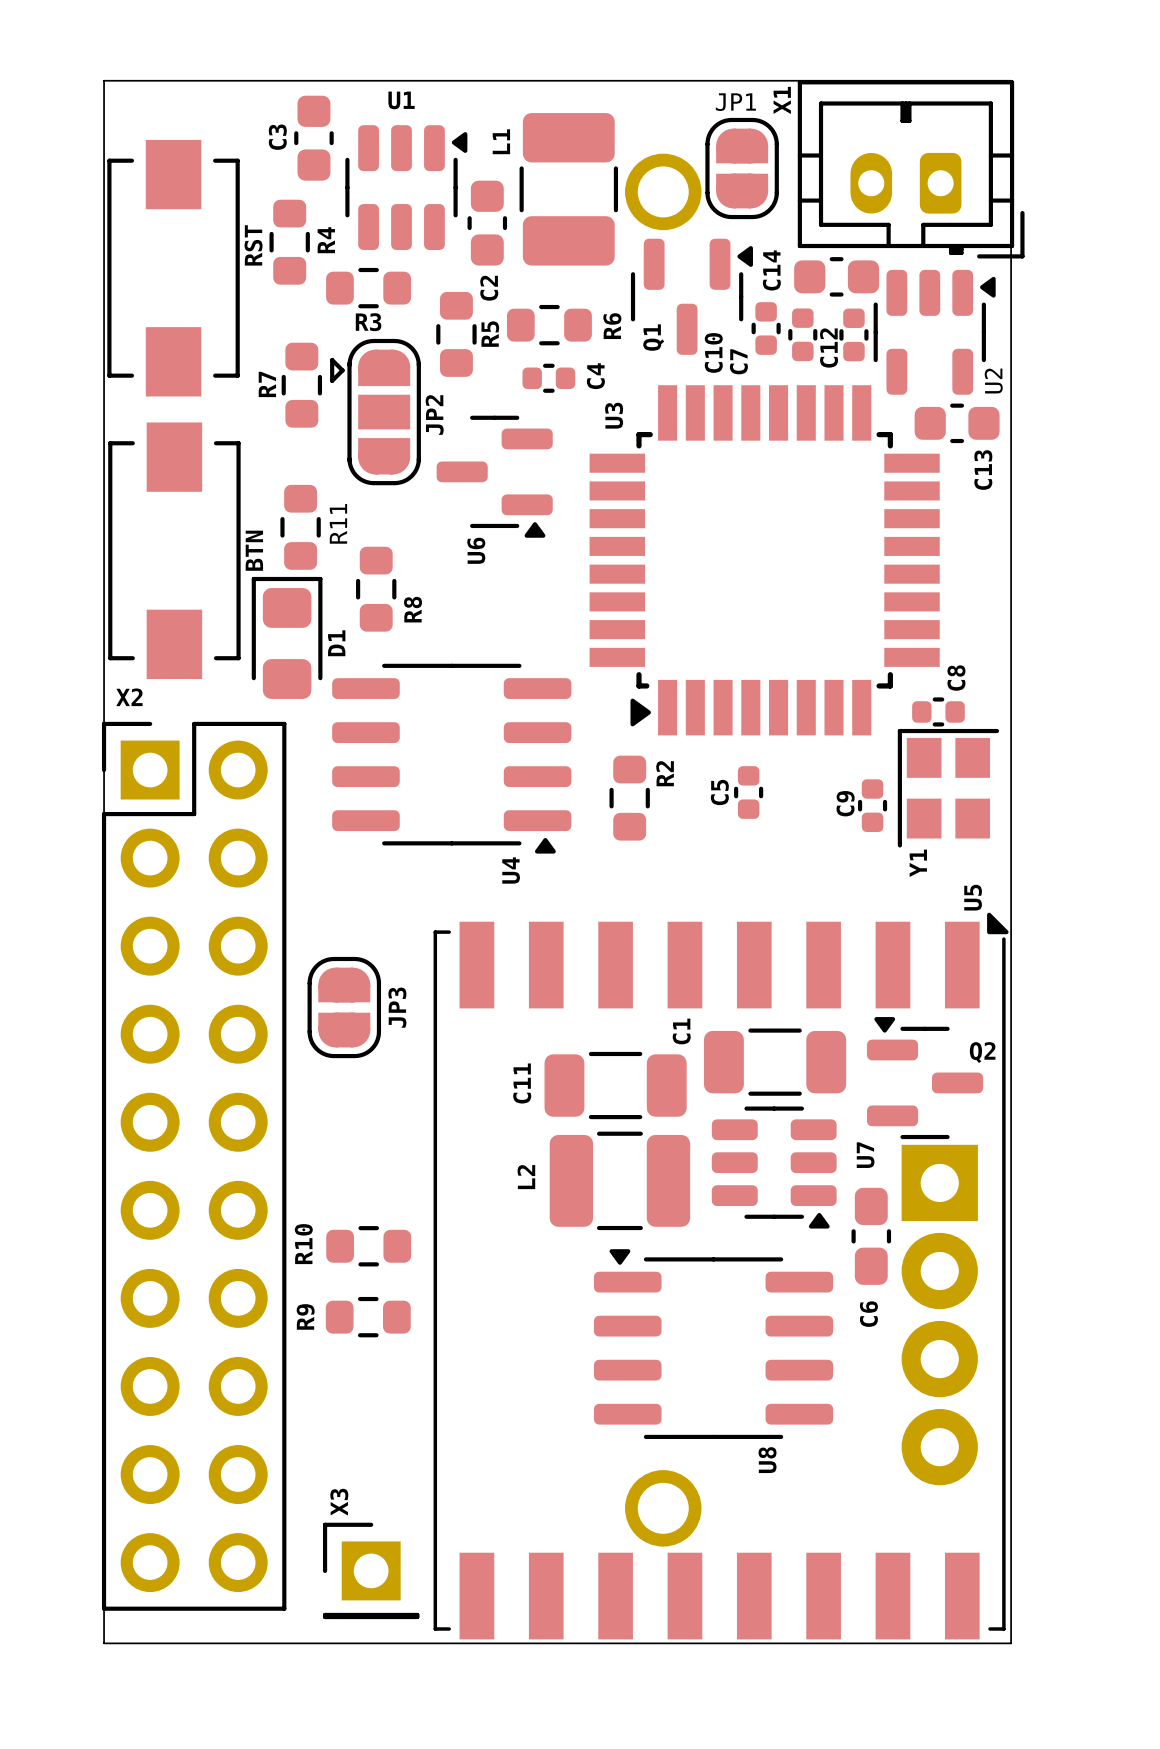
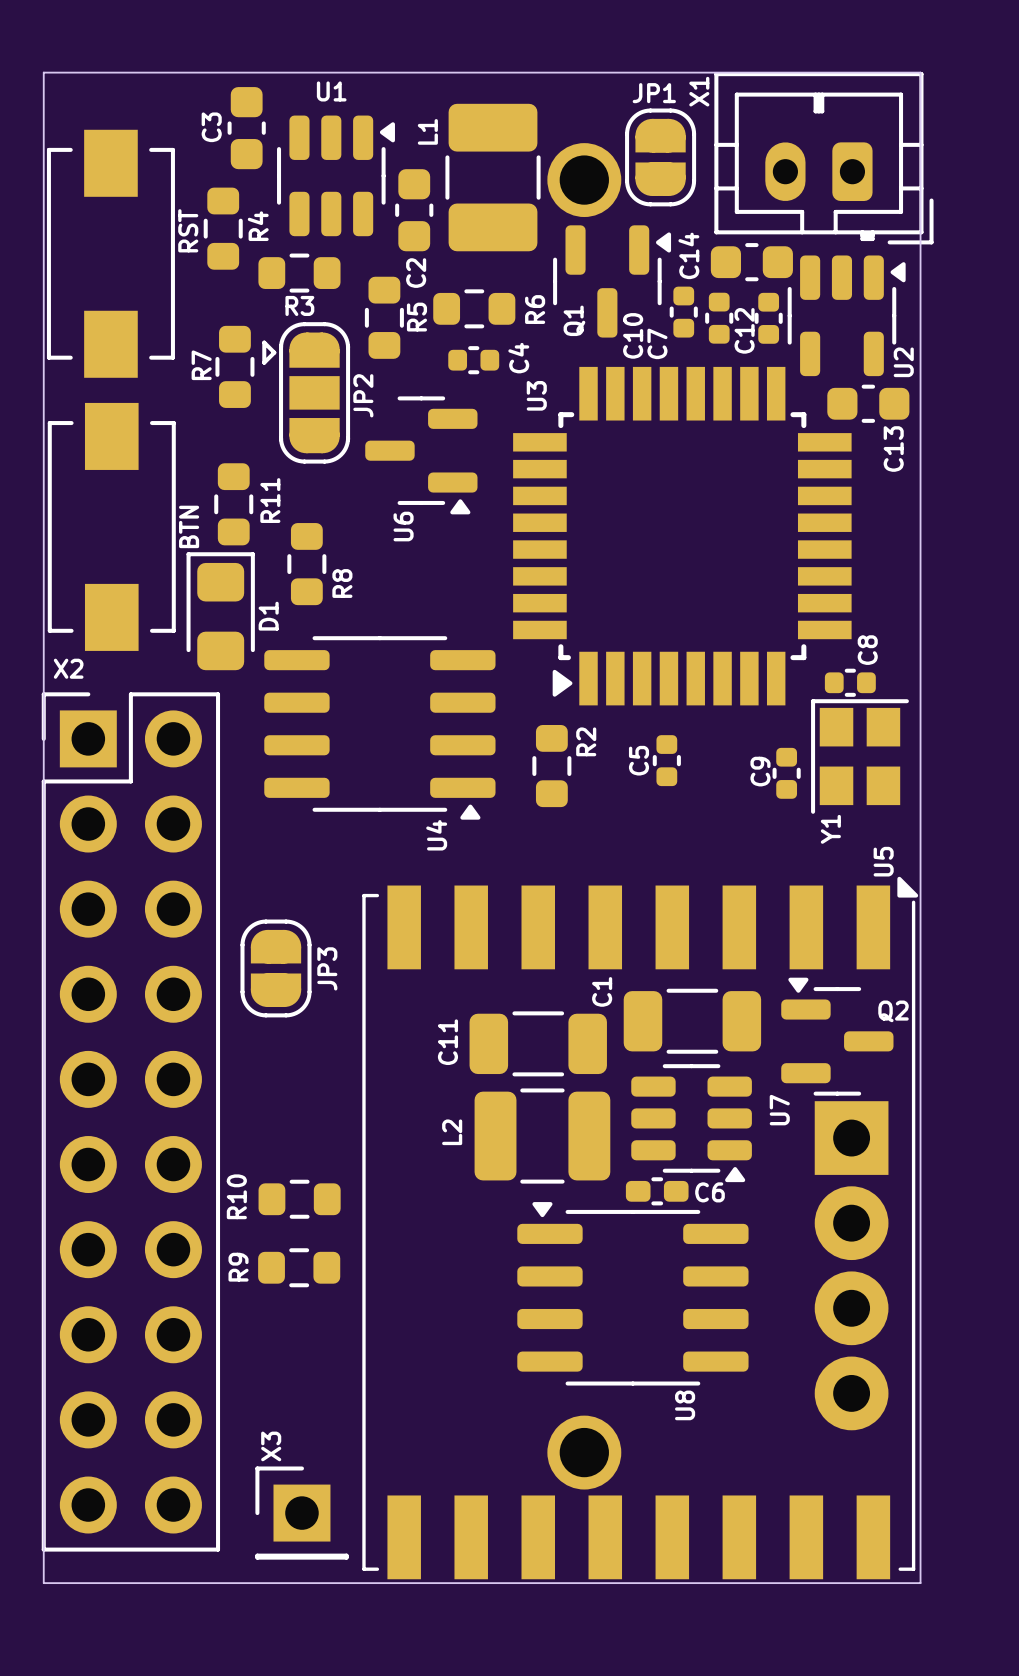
C6 footprint: [851, 1187, 892, 1285] -> [625, 1177, 689, 1206]
C6 name position: C6 (868, 1314) -> C6 (710, 1192)

